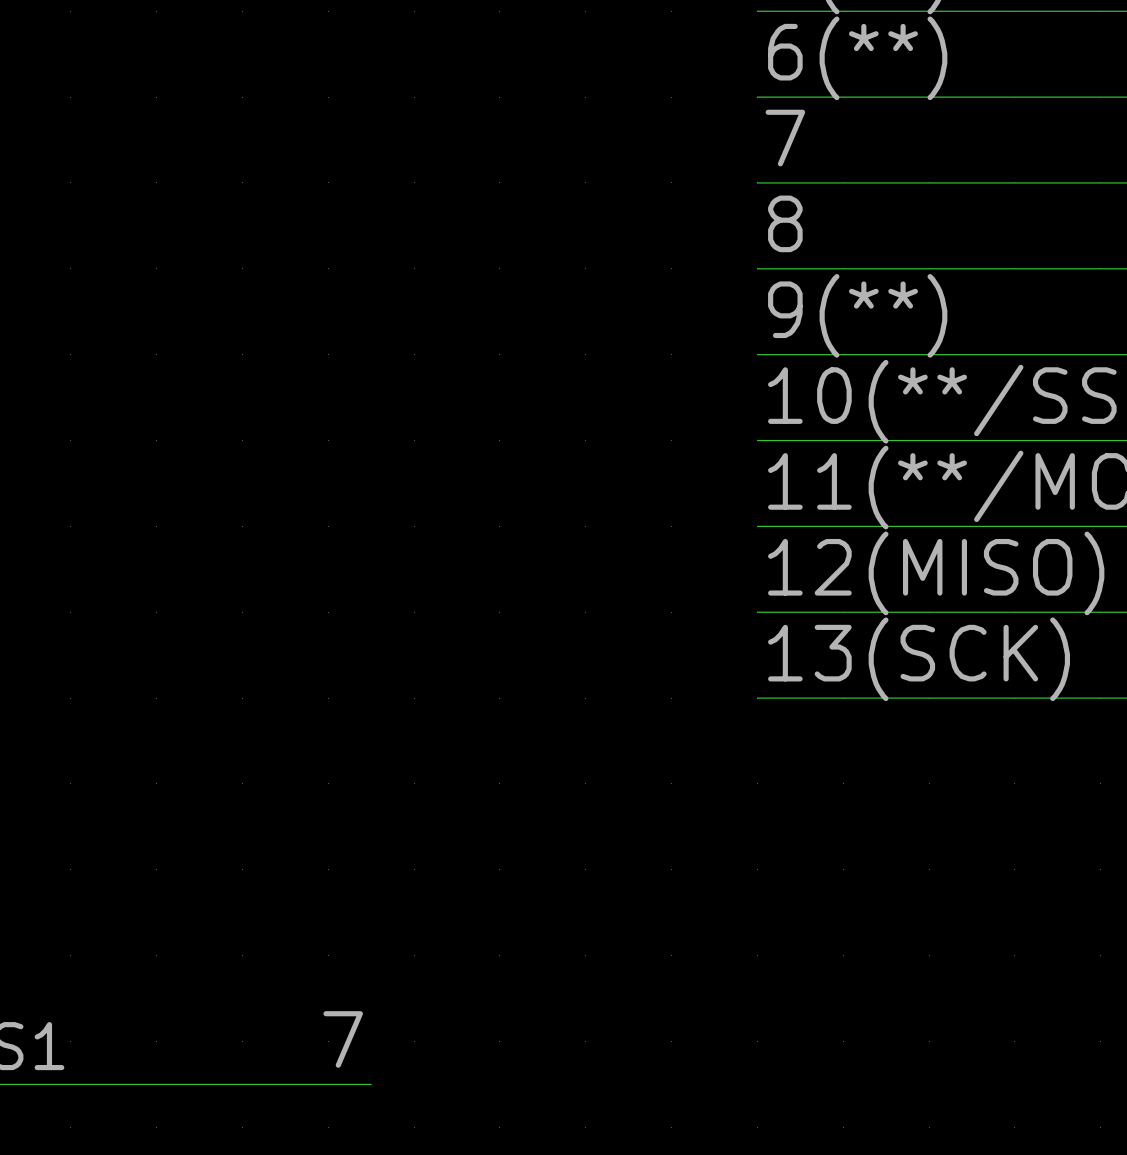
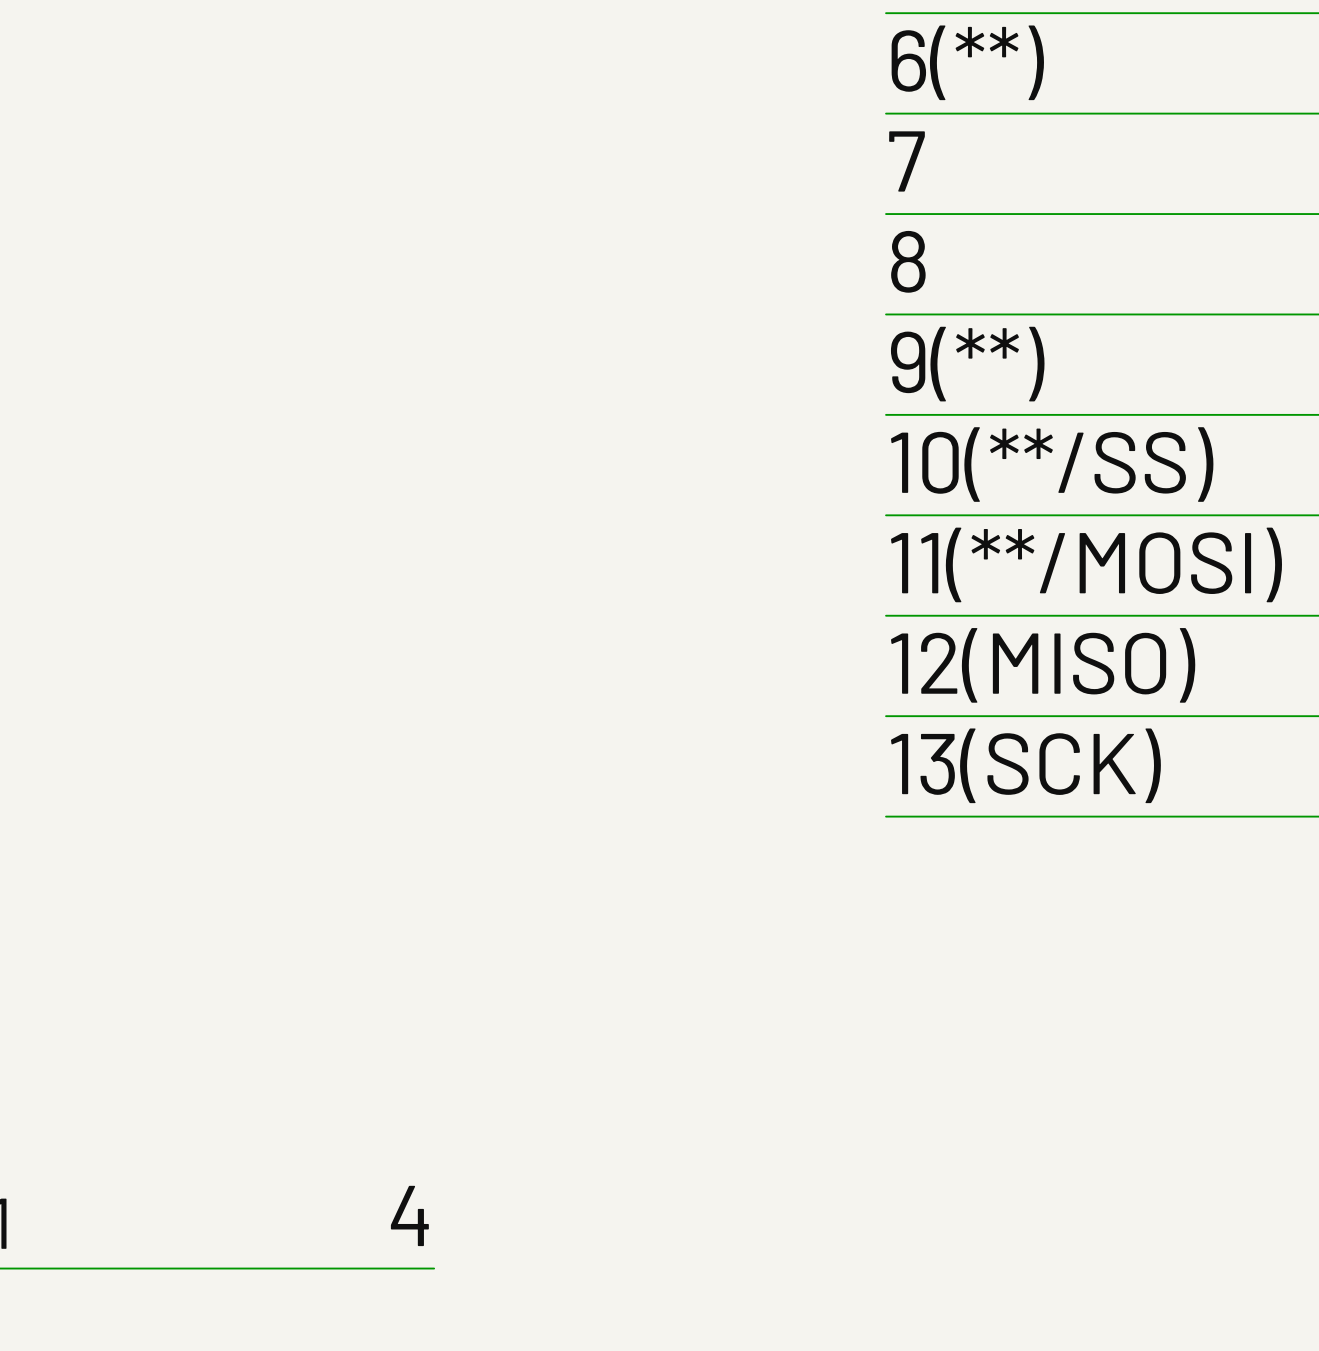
label: 7 (343, 1039) -> 4 (409, 1215)

